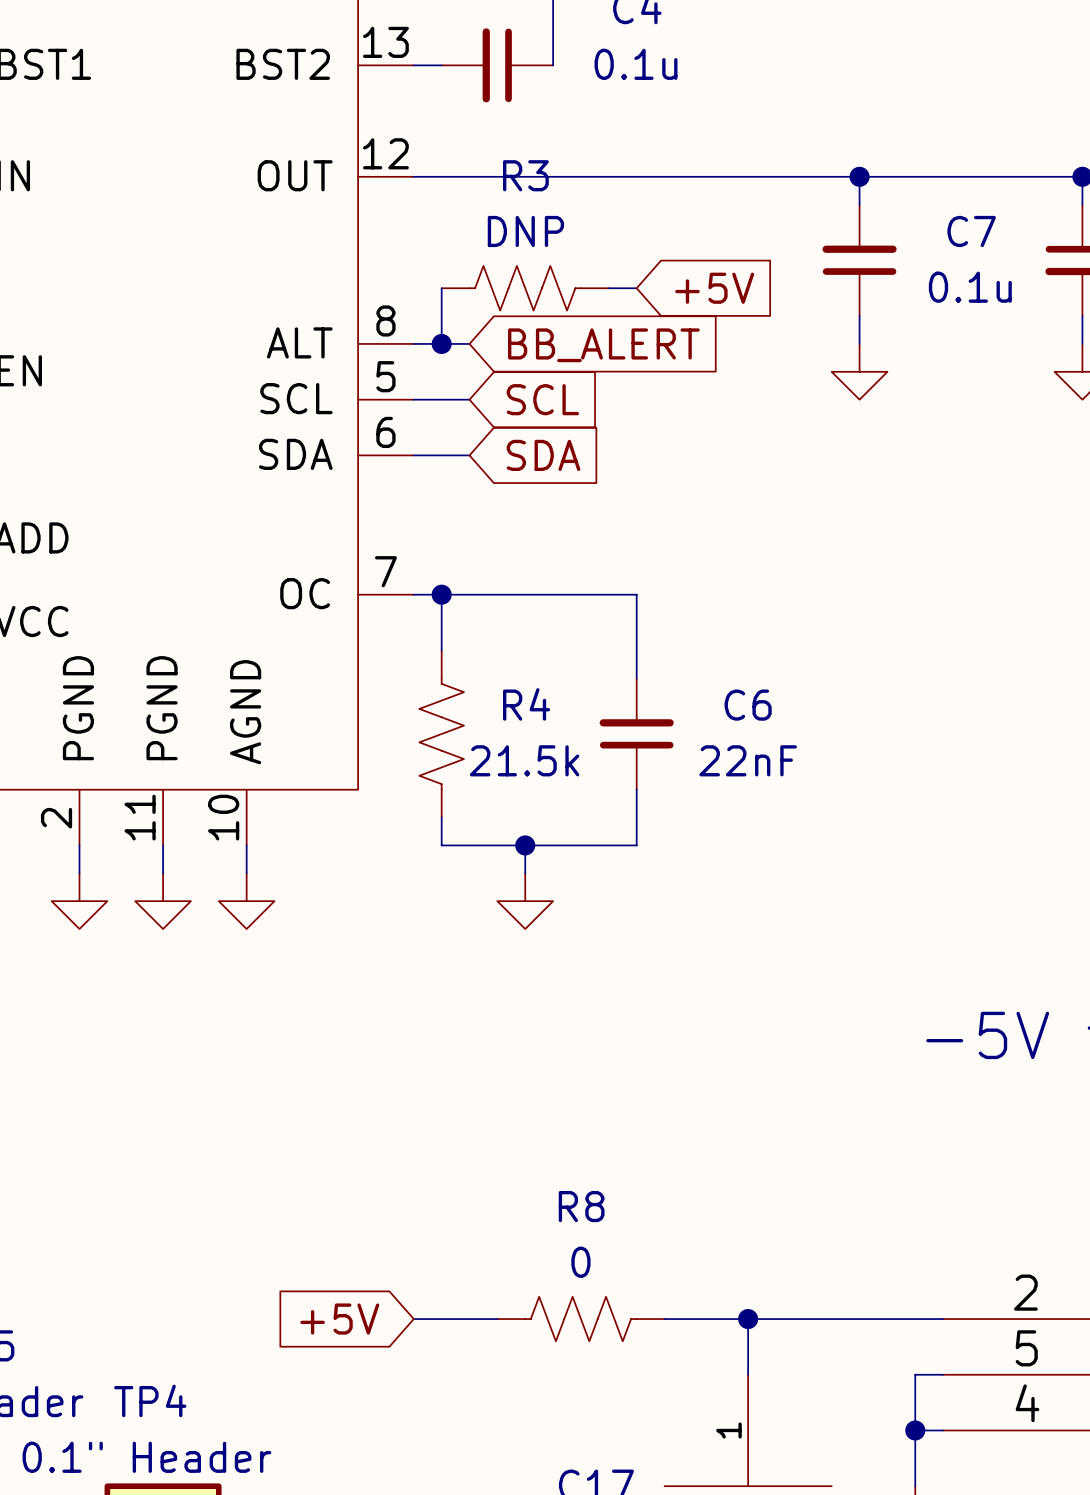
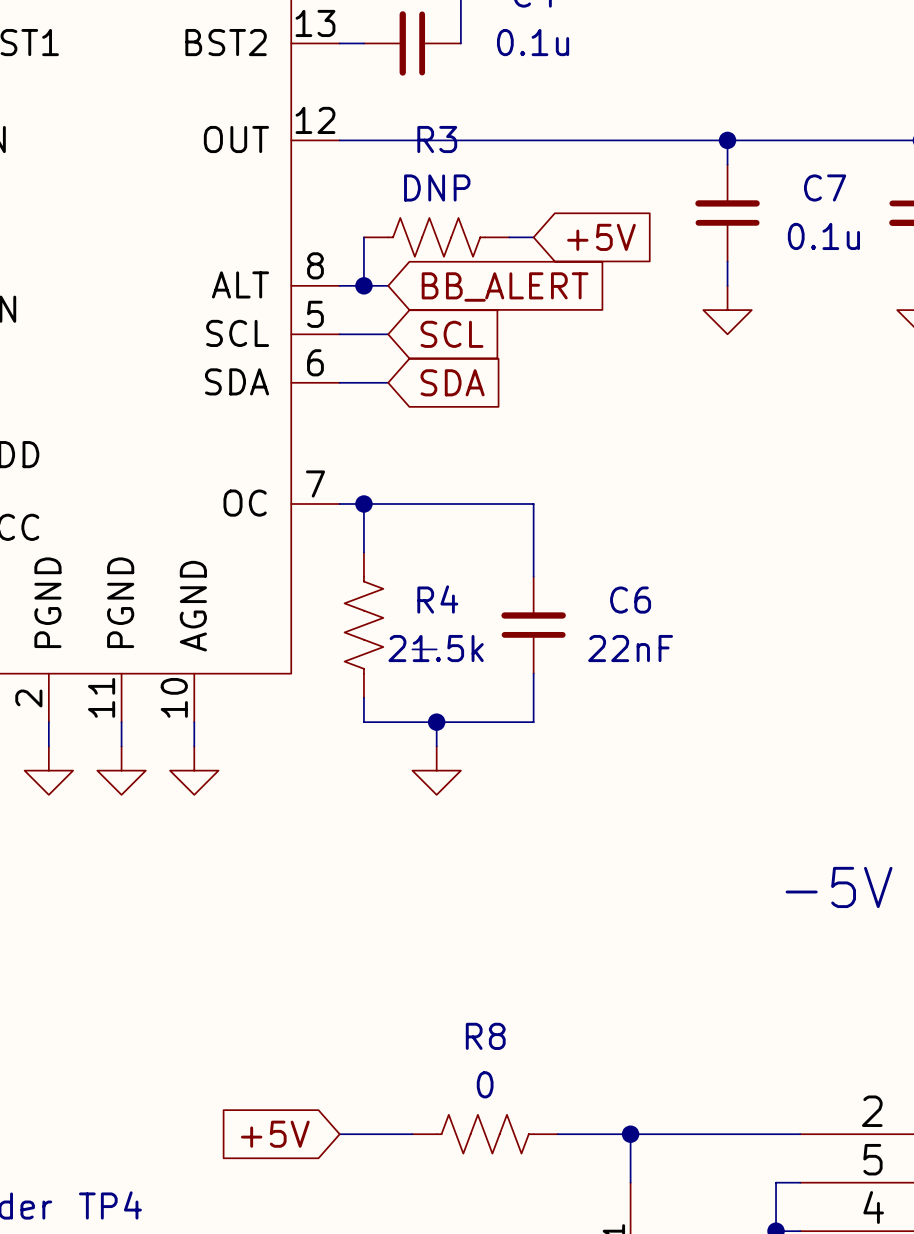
wire: none -> (412, 649) (436, 649)

